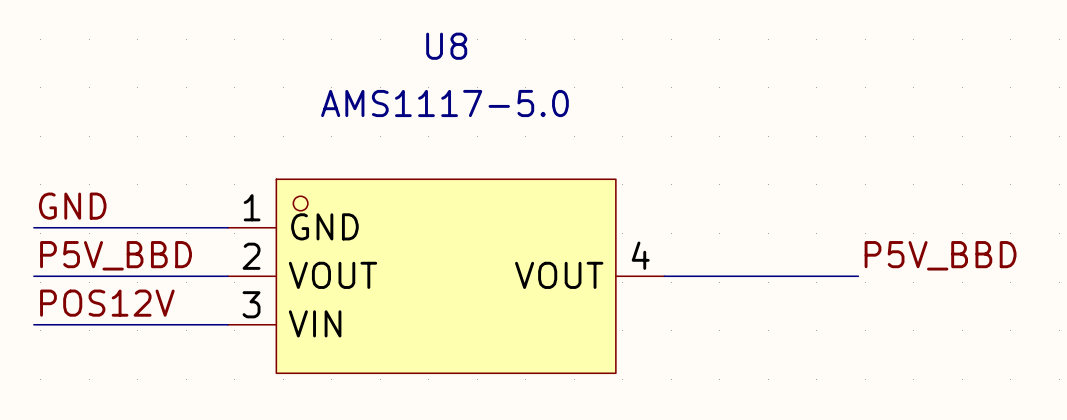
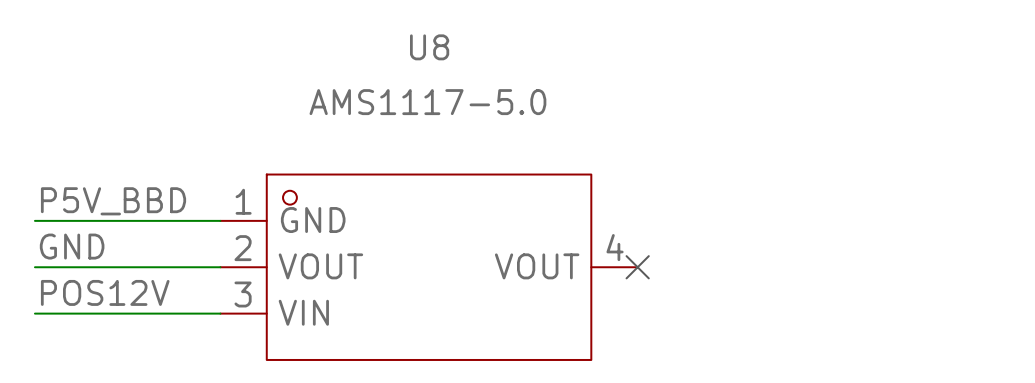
label: GND (72, 206) -> P5V_BBD (113, 201)
label: P5V_BBD (116, 255) -> GND (72, 246)
label: P5V_BBD (940, 255) -> none
wire: (664, 276) (858, 276) -> none
no-connect mark: none -> (637, 267)

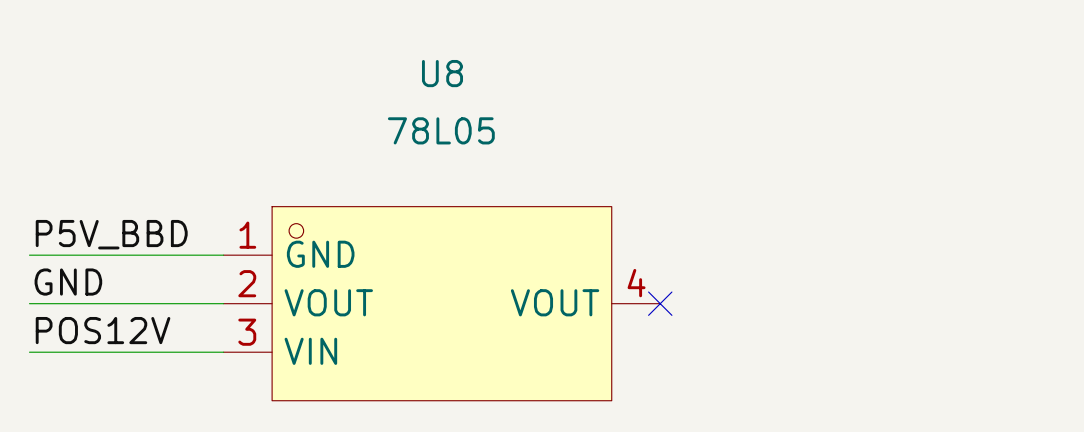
U8 value: AMS1117-5.0 (427, 102) -> 78L05 (441, 130)

